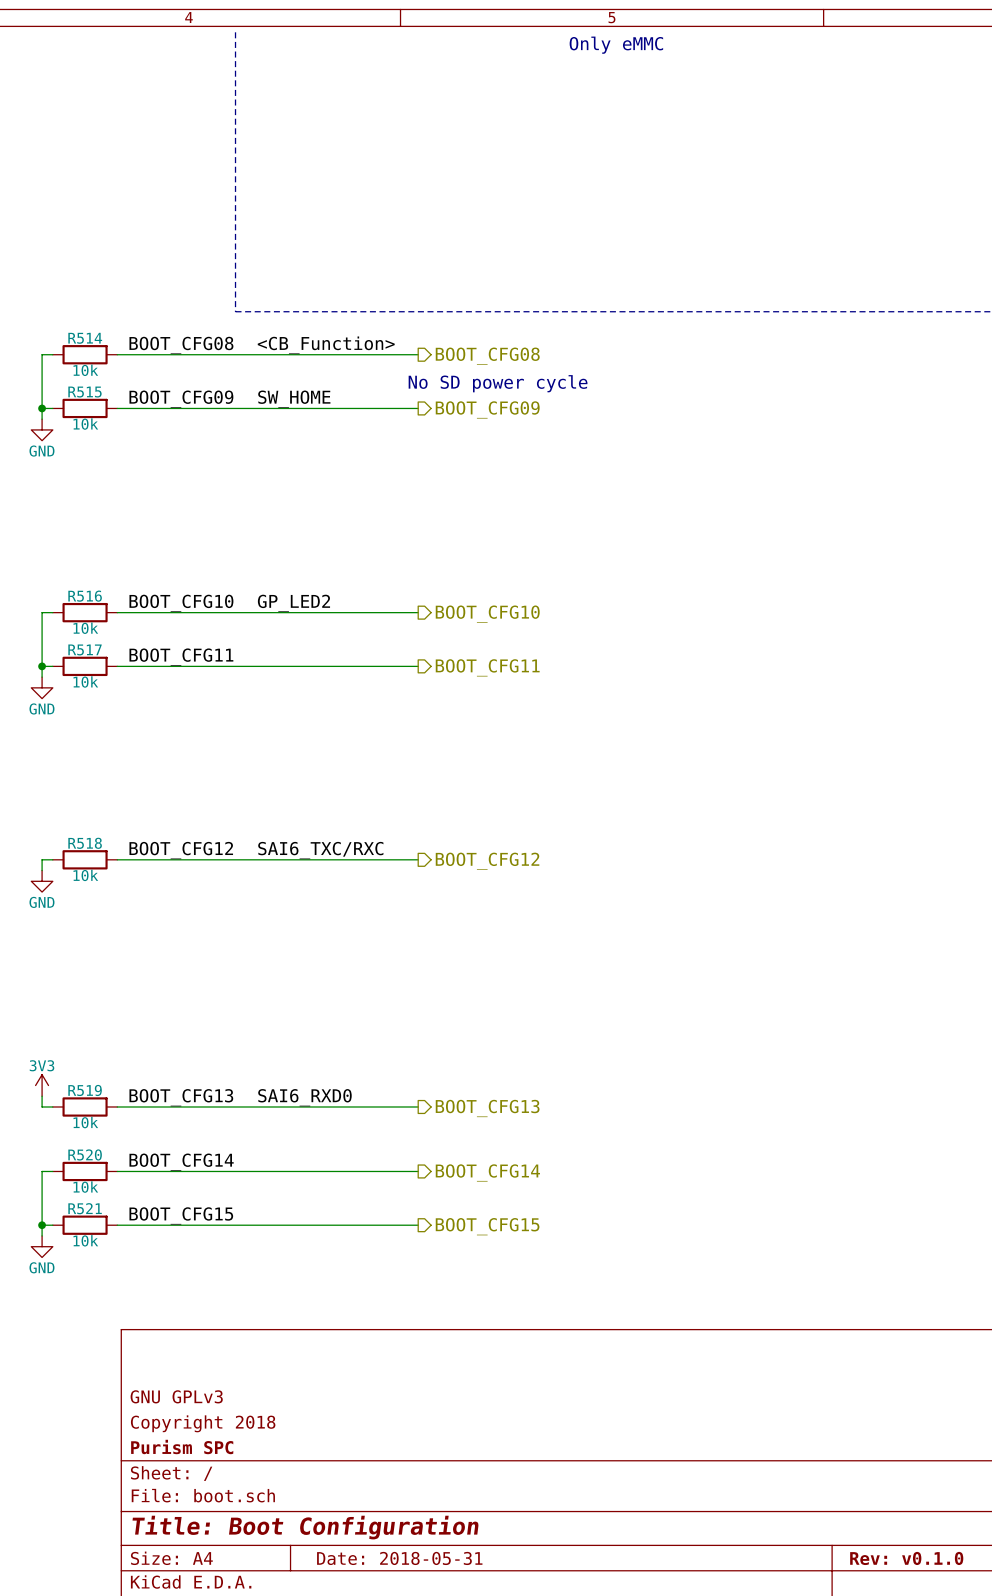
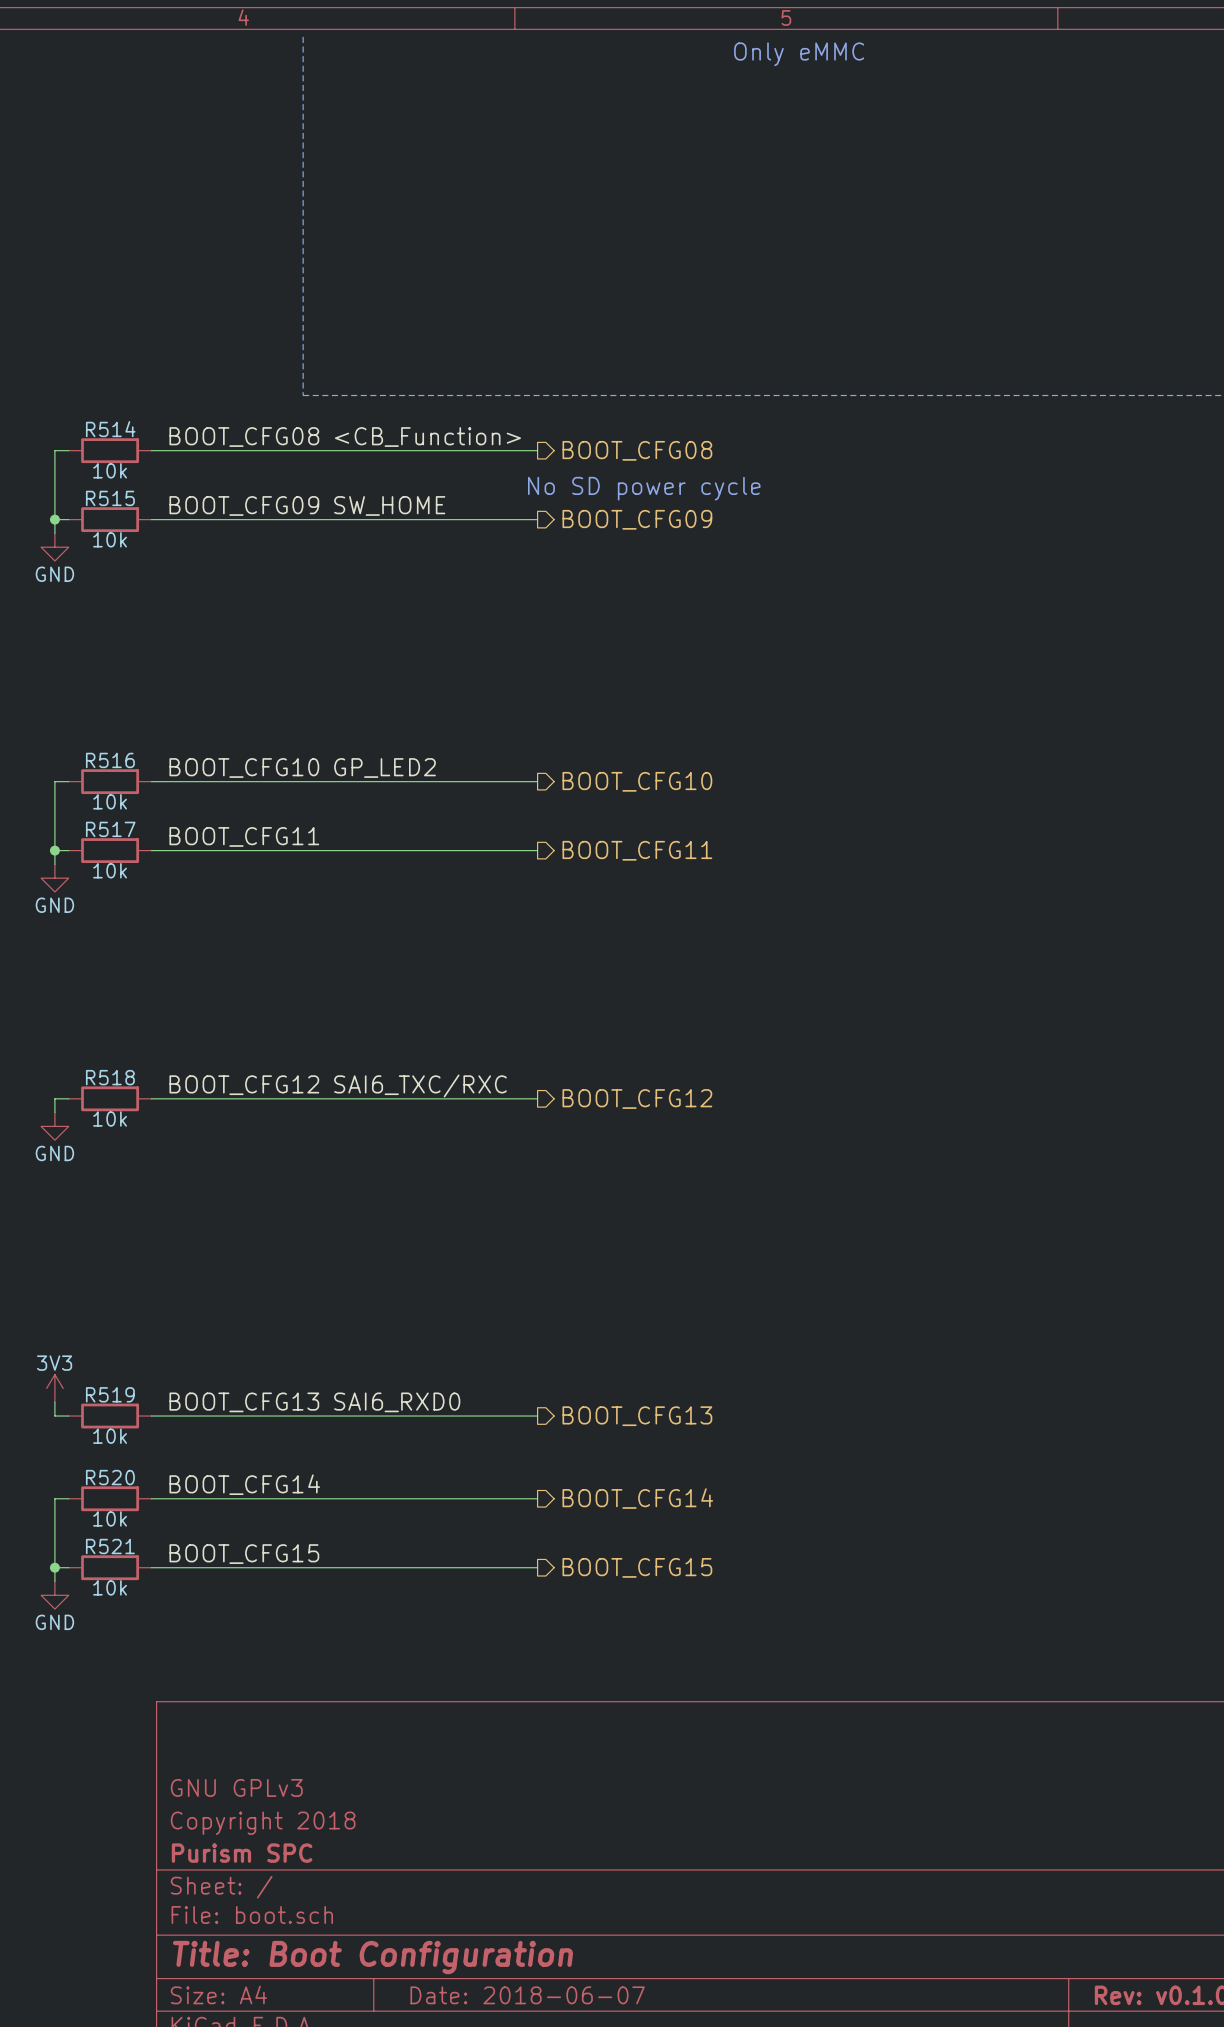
title block: Date: 2018-05-31 (399, 1558) -> Date: 2018-06-07 (527, 1995)

